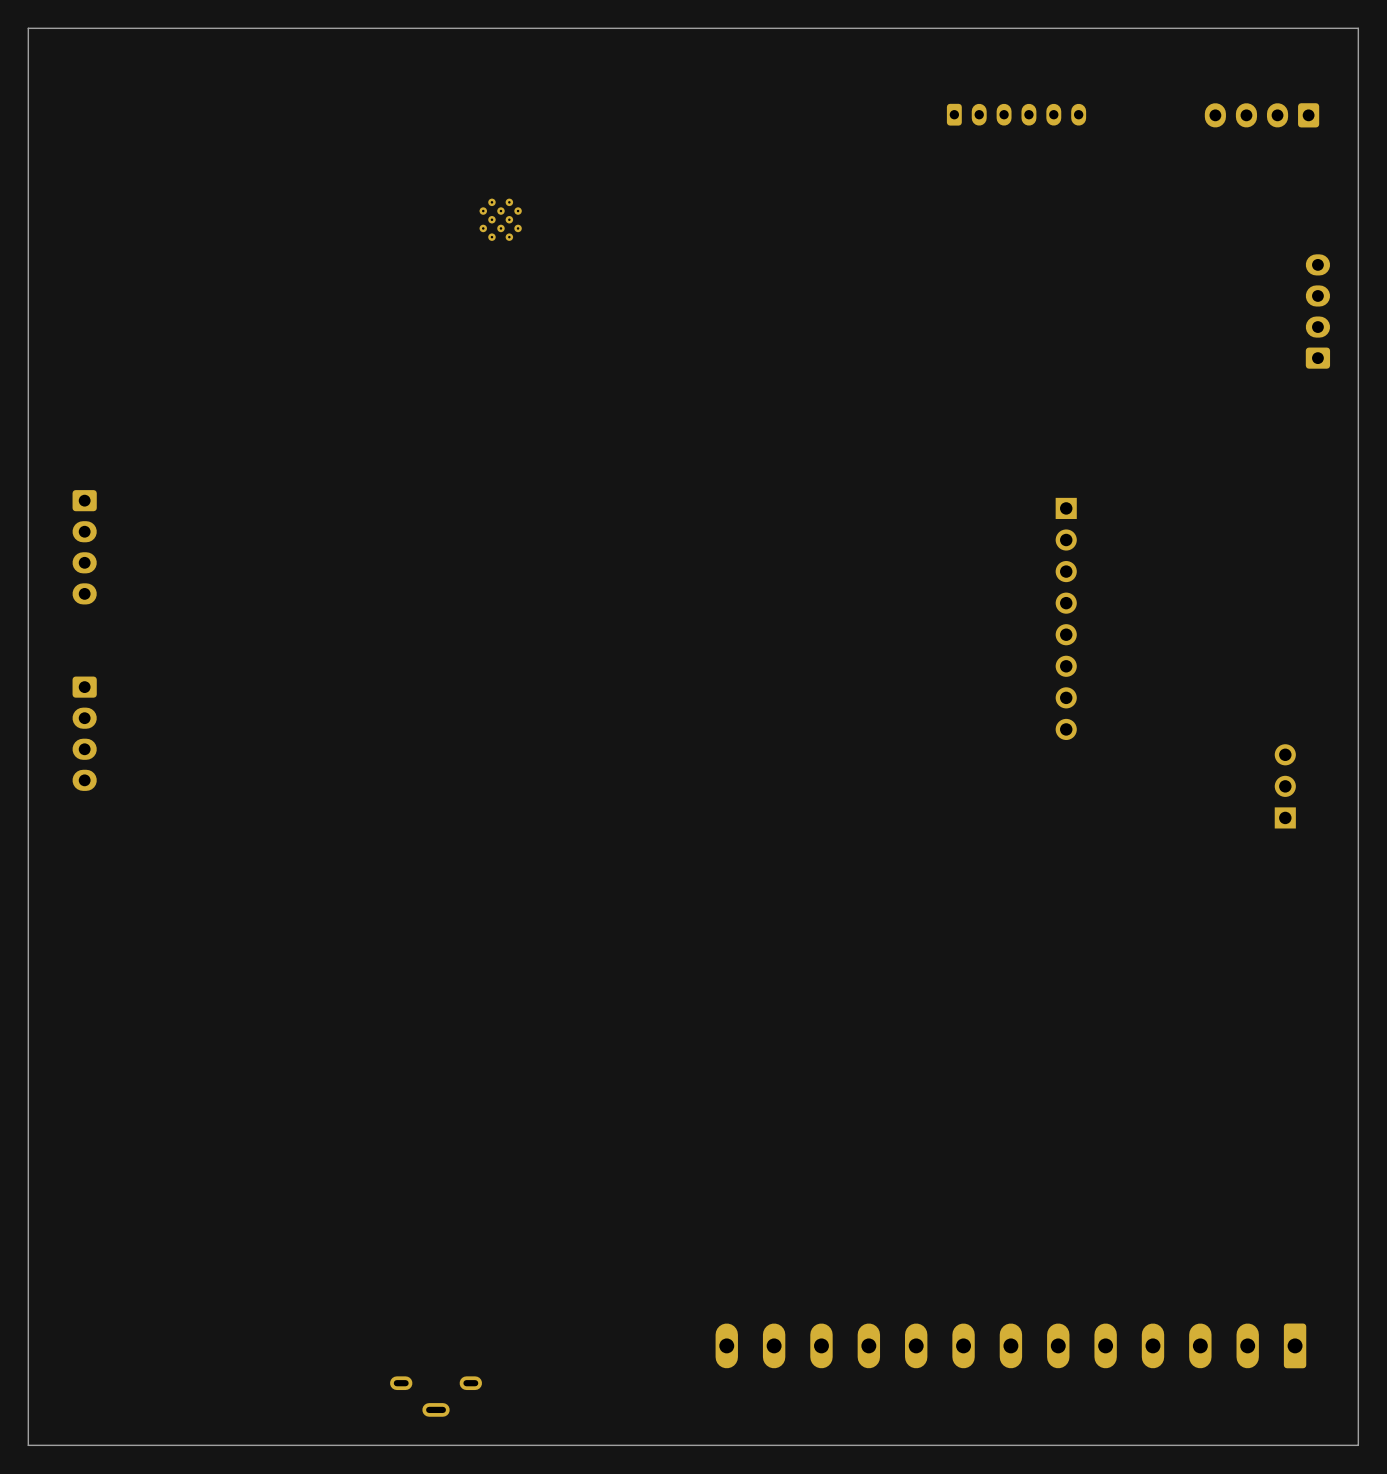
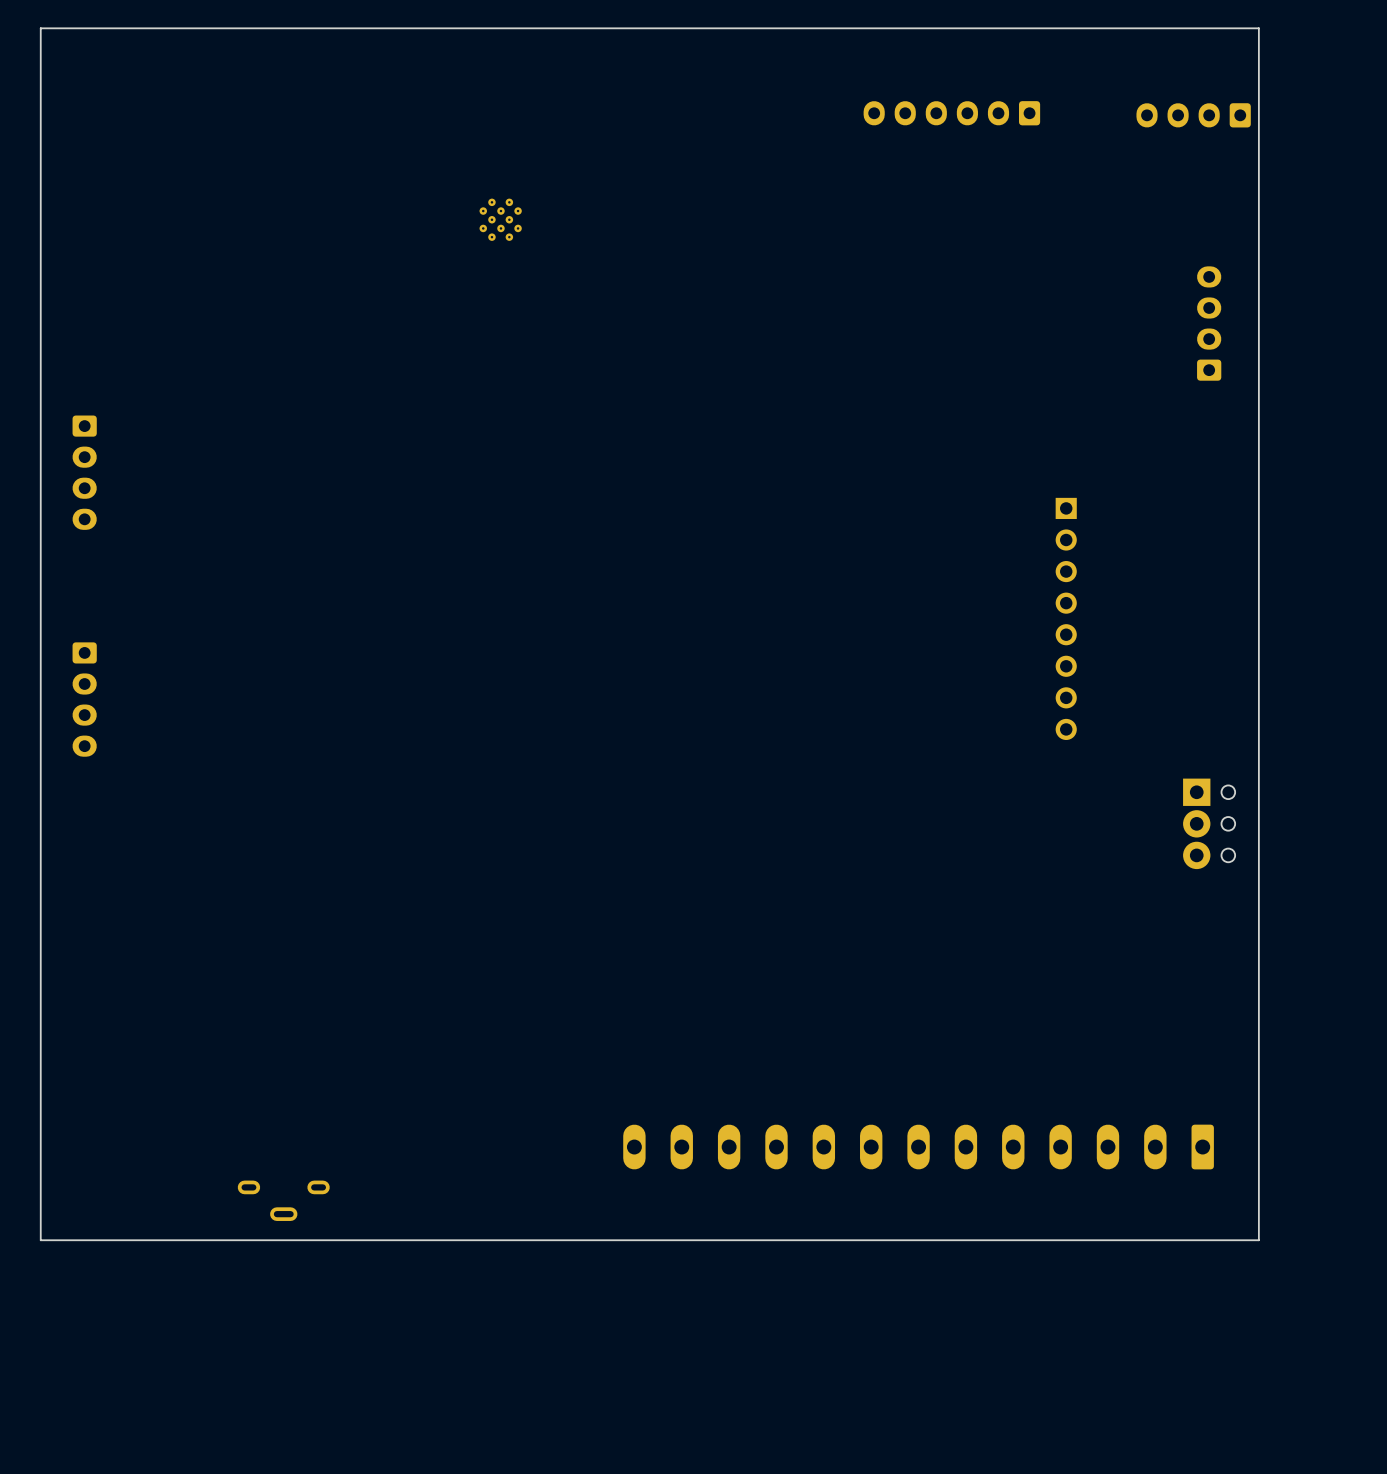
board edge: (1258, 28) (1358, 28) (1358, 1445) (28, 1445) (28, 28) (40, 28) -> (1258, 28) (1258, 1240) (40, 1240) (40, 28)
part: none -> (951, 113)
part: (1016, 114) -> none
part position: (1262, 115) -> (1193, 115)
part: (1317, 311) -> none
part: none -> (1209, 323)
part position: (84, 547) -> (84, 472)
part position: (84, 733) -> (84, 699)
part: (1285, 786) -> none
part: none -> (1209, 823)
part position: (1010, 1345) -> (918, 1147)
part position: (436, 1396) -> (283, 1200)

